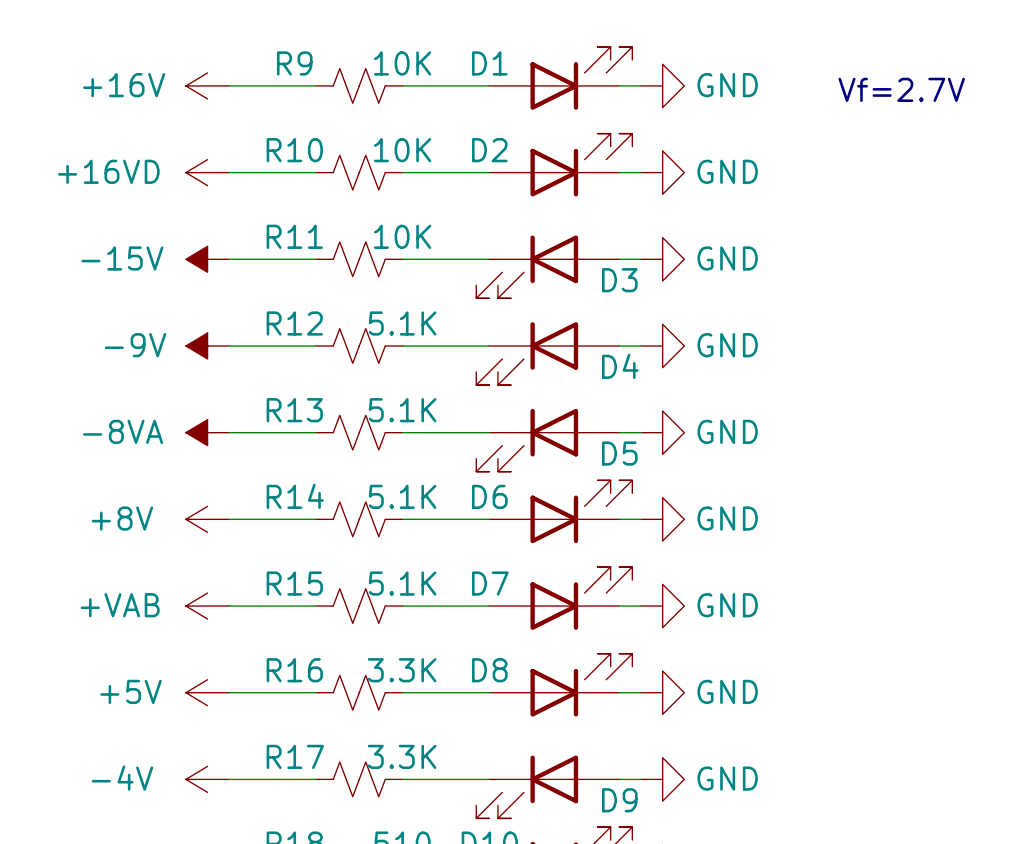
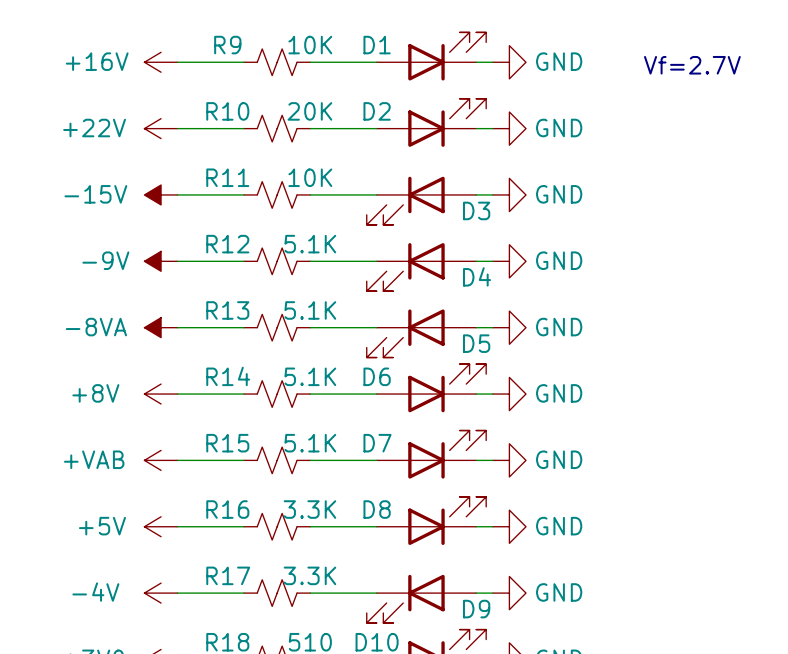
R10 value: 10K (402, 150) -> 20K (309, 111)
power symbol: +16VD (207, 172) -> +22V (161, 128)

